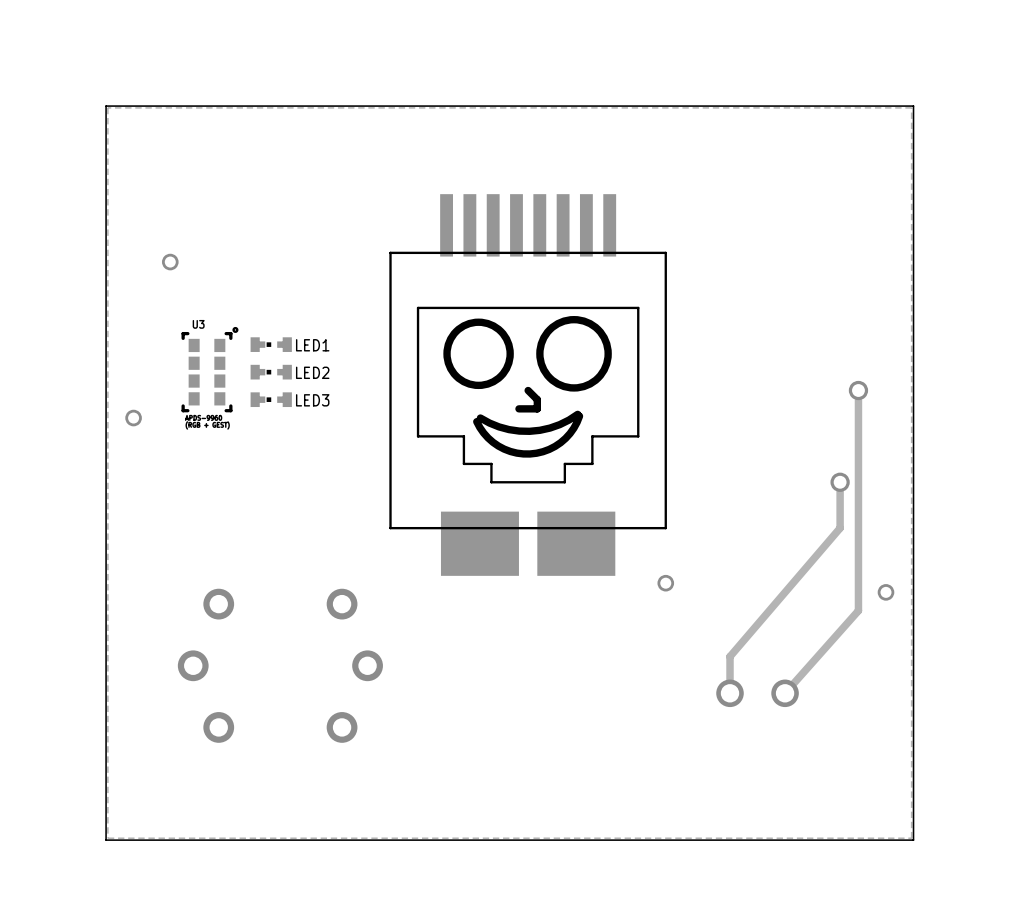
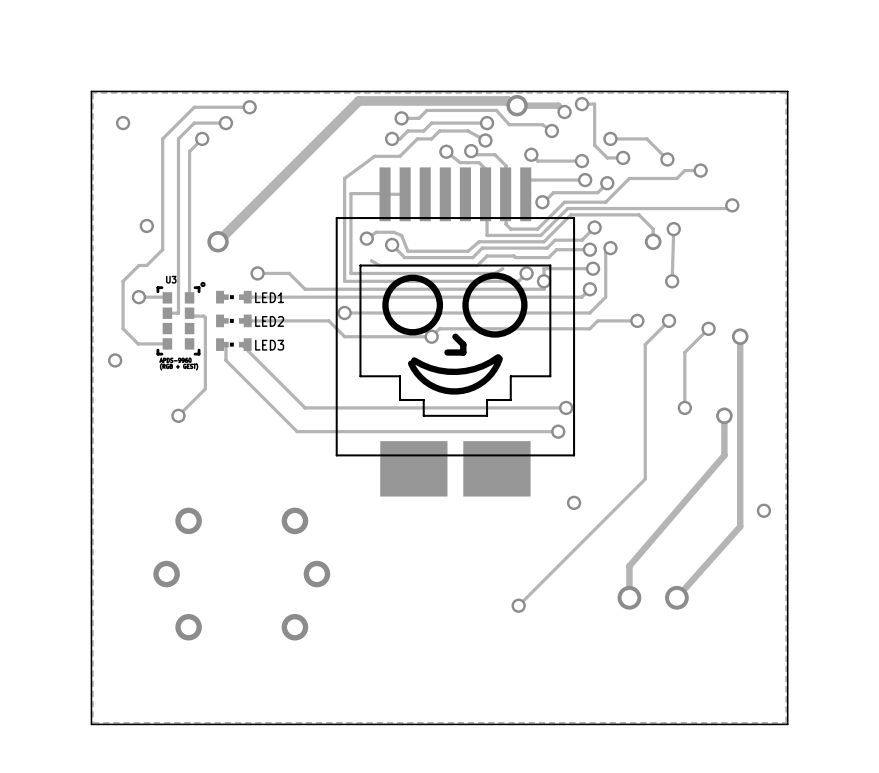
track: none -> (581, 104) (594, 104) (594, 145) (607, 157) (623, 157)
via: none -> (581, 104)
via: none -> (517, 105)
track: none -> (249, 107) (194, 107) (162, 138) (162, 249) (146, 265) (138, 265) (123, 281) (123, 328) (138, 343) (167, 343)
via: none -> (249, 107)
track: none -> (564, 112) (558, 105) (517, 105) (507, 100) (358, 100) (218, 241)
via: none -> (564, 112)
track: none -> (401, 118) (418, 118) (426, 110) (496, 110) (509, 124) (542, 124) (551, 131)
via: none -> (401, 118)
via: none -> (123, 123)
track: none -> (225, 123) (194, 123) (178, 138) (178, 312) (167, 313)
via: none -> (225, 123)
track: none -> (487, 123) (431, 123) (423, 131) (407, 131) (400, 138) (392, 138)
via: none -> (487, 123)
via: none -> (551, 131)
track: none -> (202, 138) (189, 151) (189, 297)
via: none -> (202, 138)
via: none -> (392, 138)
track: none -> (610, 138) (646, 138) (667, 159)
via: none -> (610, 138)
track: none -> (485, 140) (468, 131) (439, 131) (431, 138) (417, 138) (400, 156) (374, 156) (344, 178) (344, 281) (518, 281) (526, 273)
via: none -> (485, 140)
track: none -> (446, 151) (460, 162) (479, 162) (485, 169) (487, 235) (540, 235) (567, 208) (732, 208) (732, 205)
via: none -> (446, 151)
via: none -> (471, 151)
track: none -> (472, 154) (471, 151) (471, 154) (494, 154) (506, 165) (506, 224) (510, 229) (537, 229) (564, 202) (605, 202) (629, 178) (676, 178) (684, 170) (700, 170)
track: none -> (531, 154) (537, 161) (581, 161)
via: none -> (531, 154)
via: none -> (623, 157)
via: none -> (667, 159)
via: none -> (581, 161)
via: none -> (700, 170)
track: none -> (585, 180) (526, 180) (525, 194)
via: none -> (585, 180)
track: none -> (607, 183) (597, 192) (553, 192) (542, 202)
via: none -> (607, 183)
track: none -> (405, 194) (350, 193) (350, 273) (494, 273) (502, 268)
via: none -> (542, 202)
via: none -> (732, 205)
track: none -> (594, 227) (581, 240) (555, 240) (547, 248) (482, 248) (472, 257) (404, 257) (392, 244)
via: none -> (594, 227)
track: none -> (673, 229) (672, 281)
via: none -> (673, 229)
track: none -> (366, 238) (376, 232) (393, 232) (401, 235) (407, 251) (468, 251) (479, 241) (544, 241) (570, 214) (638, 214) (653, 229) (653, 241)
via: none -> (366, 238)
via: none -> (218, 241)
via: none -> (653, 241)
via: none -> (392, 244)
track: none -> (610, 248) (605, 252) (605, 297) (589, 312) (344, 312)
via: none -> (610, 248)
track: none -> (589, 249) (556, 249) (548, 257) (487, 256) (477, 265) (379, 265) (371, 260)
via: none -> (589, 249)
track: none -> (593, 268) (544, 268) (544, 289) (305, 289) (289, 273) (257, 273)
via: none -> (593, 268)
via: none -> (257, 273)
via: none -> (526, 273)
via: none -> (544, 281)
via: none -> (672, 281)
track: none -> (589, 289) (581, 297) (241, 297)
via: none -> (589, 289)
track: none -> (138, 297) (167, 297)
via: none -> (138, 297)
via: none -> (344, 312)
track: none -> (189, 313) (192, 316) (205, 317) (205, 388) (178, 415)
track: none -> (241, 320) (328, 320) (344, 336) (431, 336) (439, 328) (589, 328) (597, 320) (637, 320)
via: none -> (637, 320)
track: none -> (669, 320) (645, 344) (645, 479) (518, 605)
via: none -> (669, 320)
track: none -> (708, 328) (684, 352) (684, 407)
via: none -> (708, 328)
via: none -> (431, 336)
track: none -> (225, 344) (225, 360) (297, 431) (558, 431)
track: none -> (241, 344) (305, 407) (566, 407)
via: none -> (566, 407)
via: none -> (684, 407)
via: none -> (178, 415)
via: none -> (558, 431)
via: none -> (518, 605)

